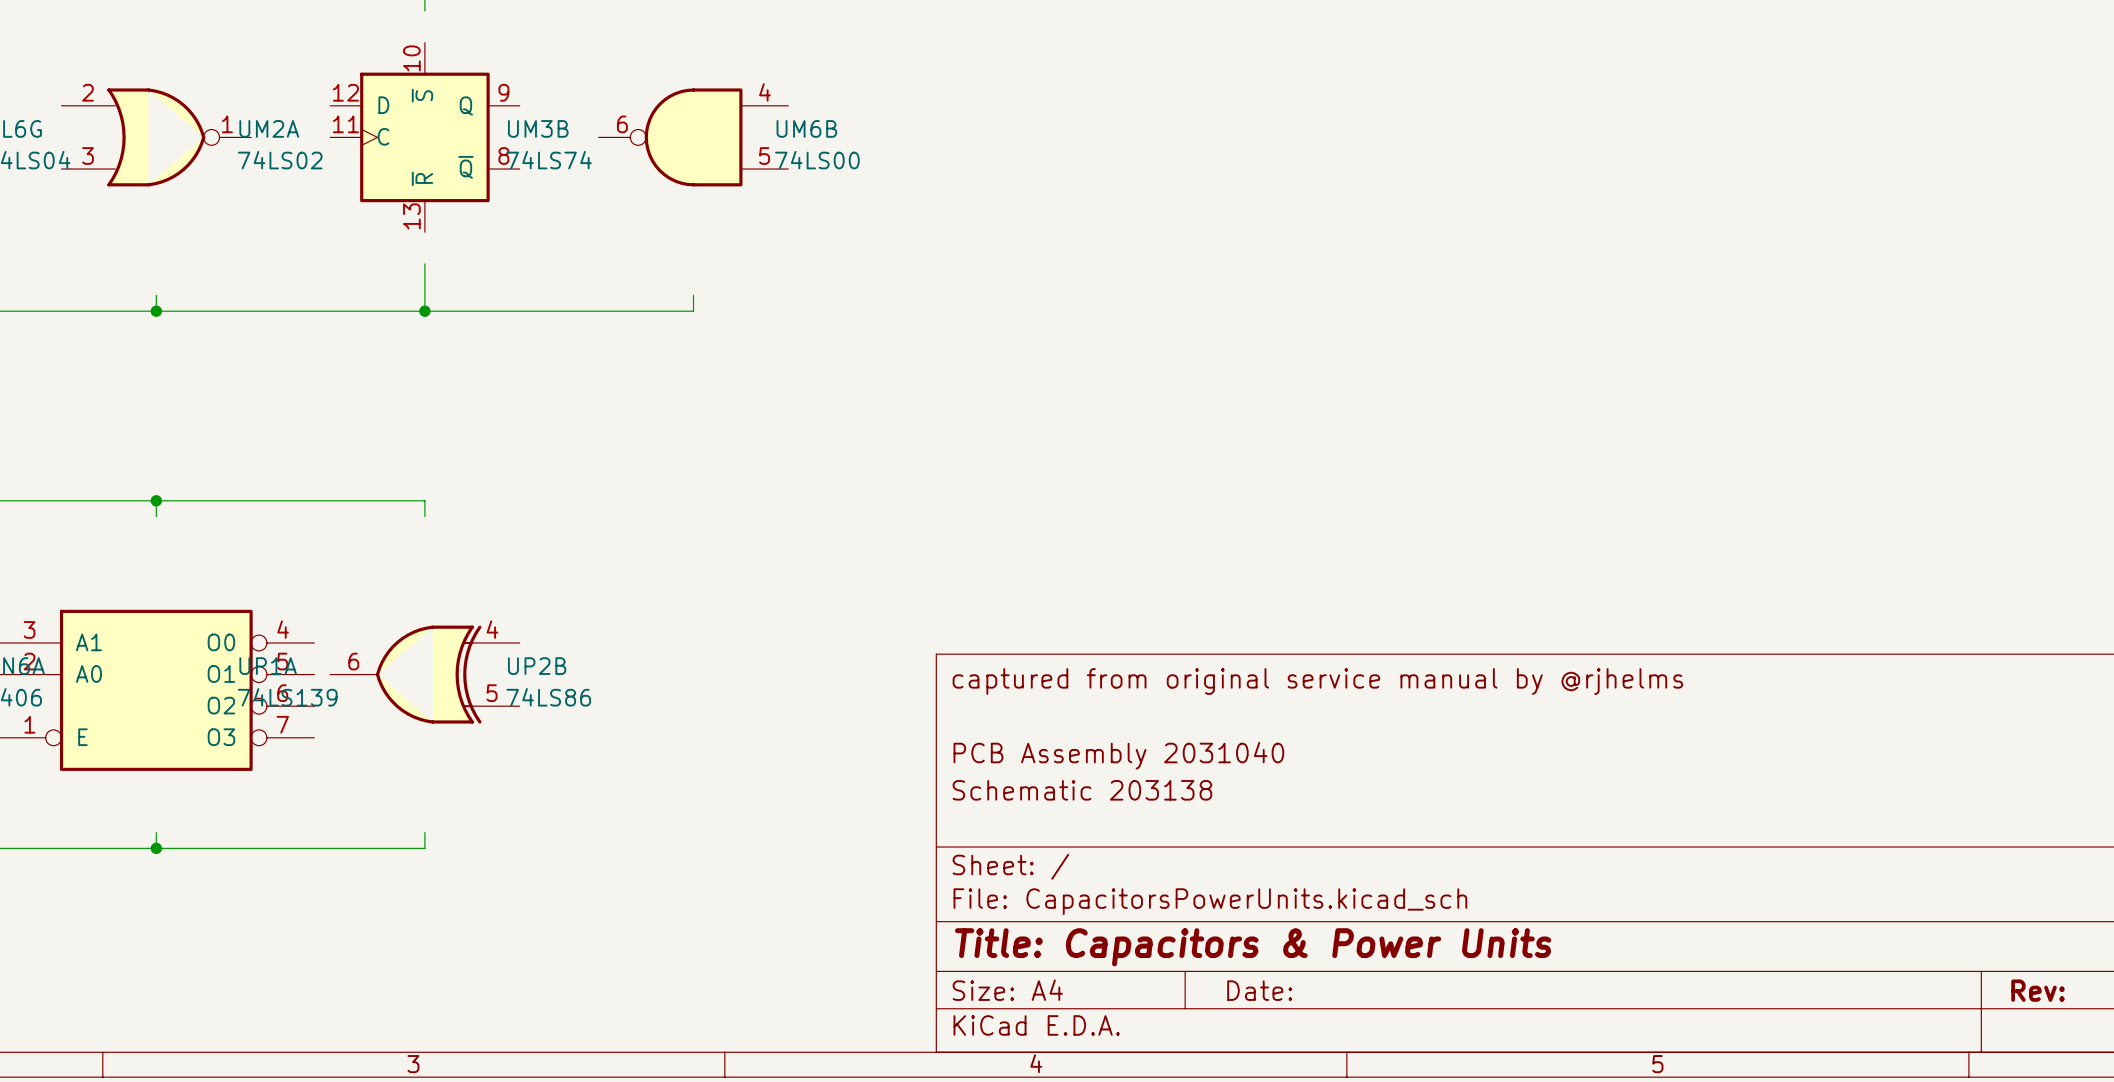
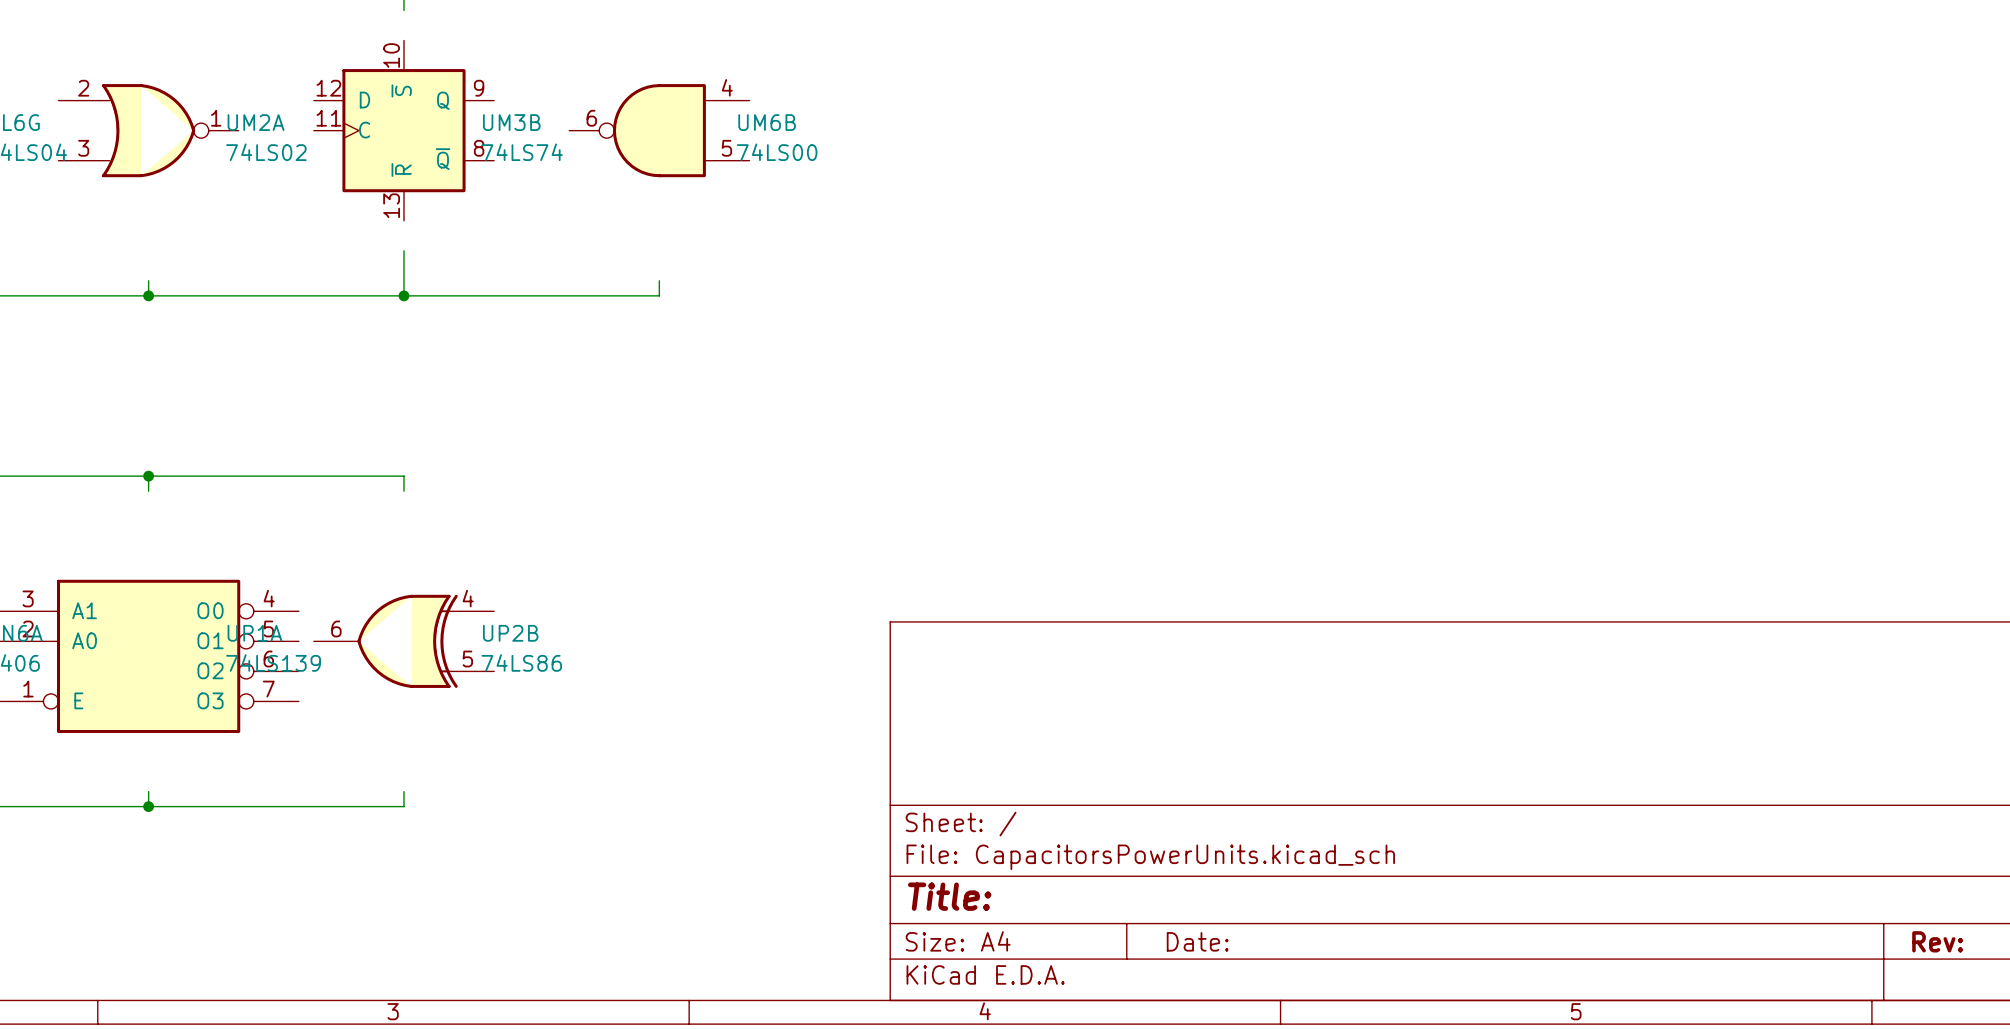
title block: captured from original service manual by @rjhelms (1317, 681) -> none
title block: PCB Assembly 2031040 (1118, 755) -> none
title block: Schematic 203138 (1082, 790) -> none
title block: Title: Capacitors & Power Units (1253, 947) -> Title: (949, 896)

